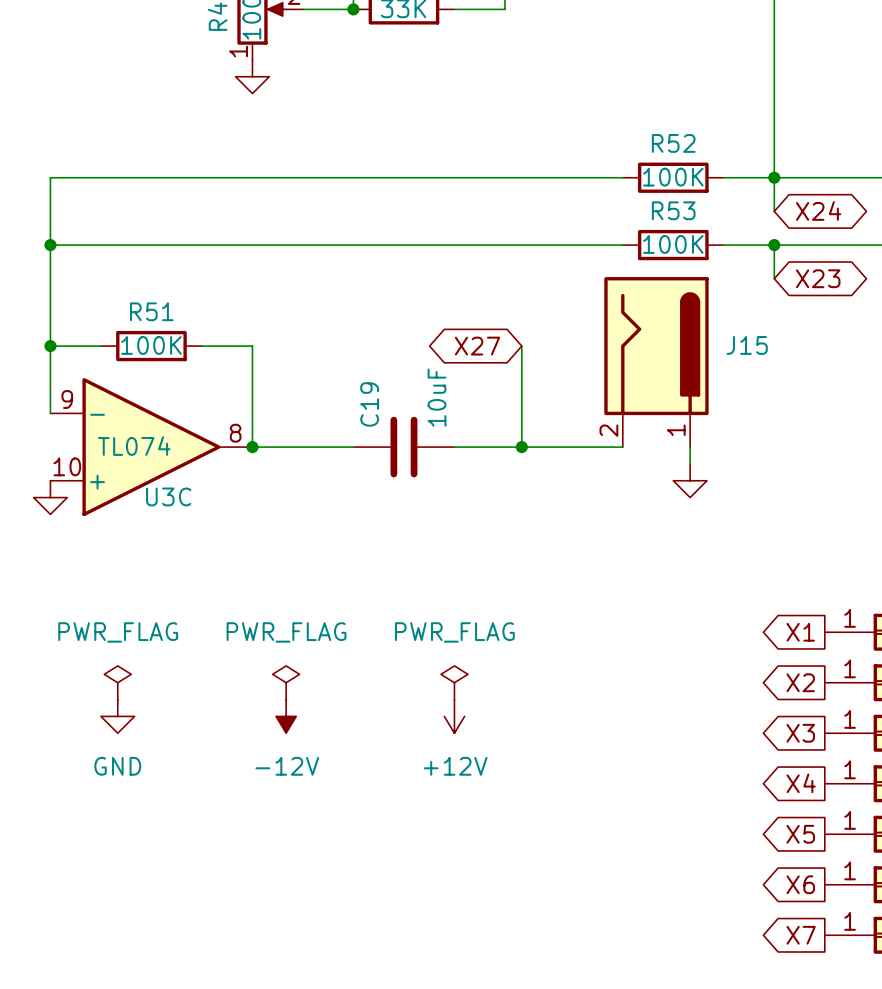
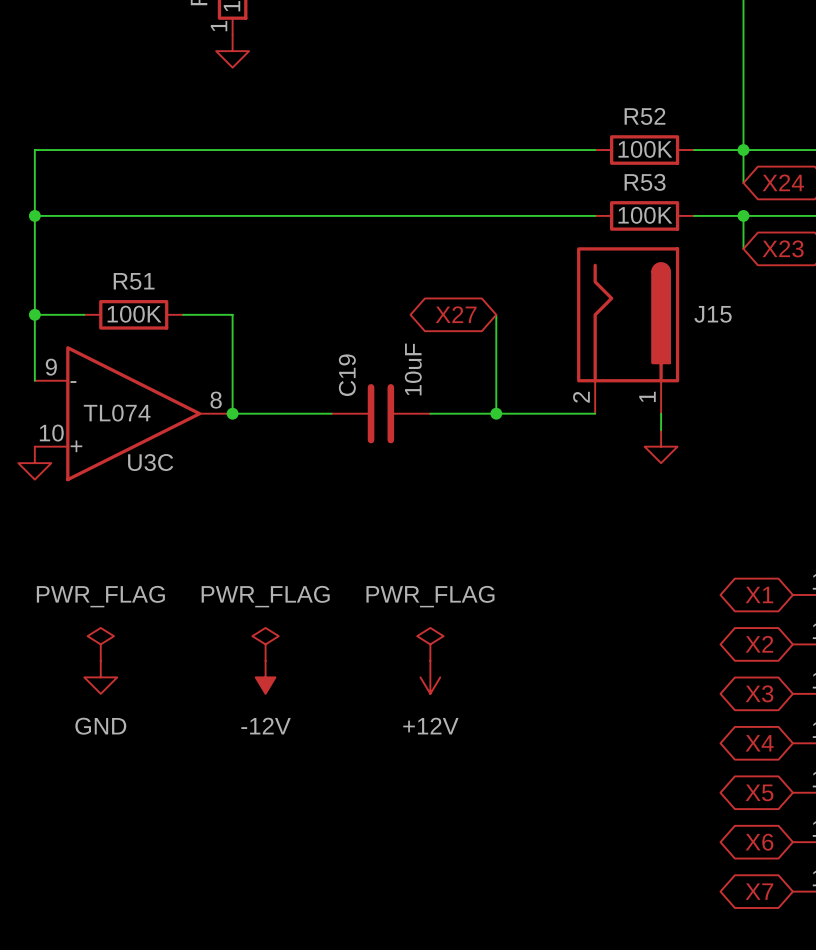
global label shape: output (800, 632) -> bidirectional (759, 594)
global label shape: output (800, 682) -> bidirectional (759, 644)
global label shape: output (800, 733) -> bidirectional (759, 693)
global label shape: output (801, 783) -> bidirectional (759, 743)
global label shape: output (800, 834) -> bidirectional (759, 792)
global label shape: output (800, 884) -> bidirectional (759, 842)
global label shape: output (801, 935) -> bidirectional (759, 891)

